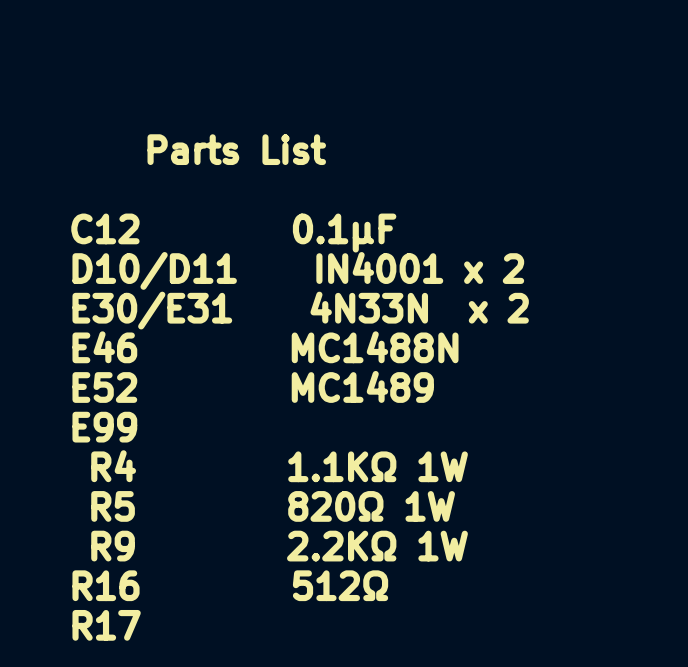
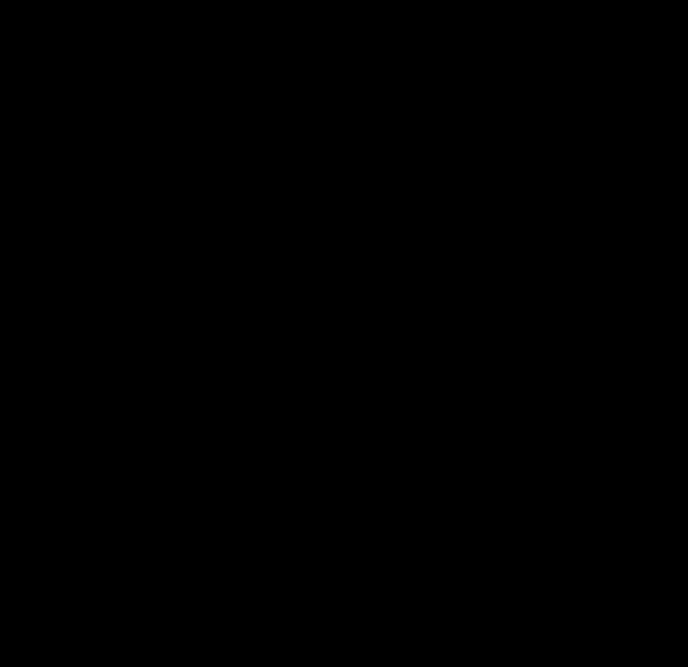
text: Parts List (236, 149) -> none
text: C12 0.1µF (233, 233) -> none
text: D10/D11 IN4001 x 2 (298, 270) -> none
text: E30/E31 4N33N x 2 (300, 310) -> none
text: E46 MC1488N (265, 347) -> none
text: E52 MC1489 (253, 386) -> none
text: E99 (104, 427) -> none
text: R4 1.1KΩ 1W (279, 466) -> none
text: R5 820Ω 1W (273, 506) -> none
text: R9 2.2KΩ 1W (279, 546) -> none
text: R16 512Ω (230, 585) -> none
text: R17 (106, 625) -> none

